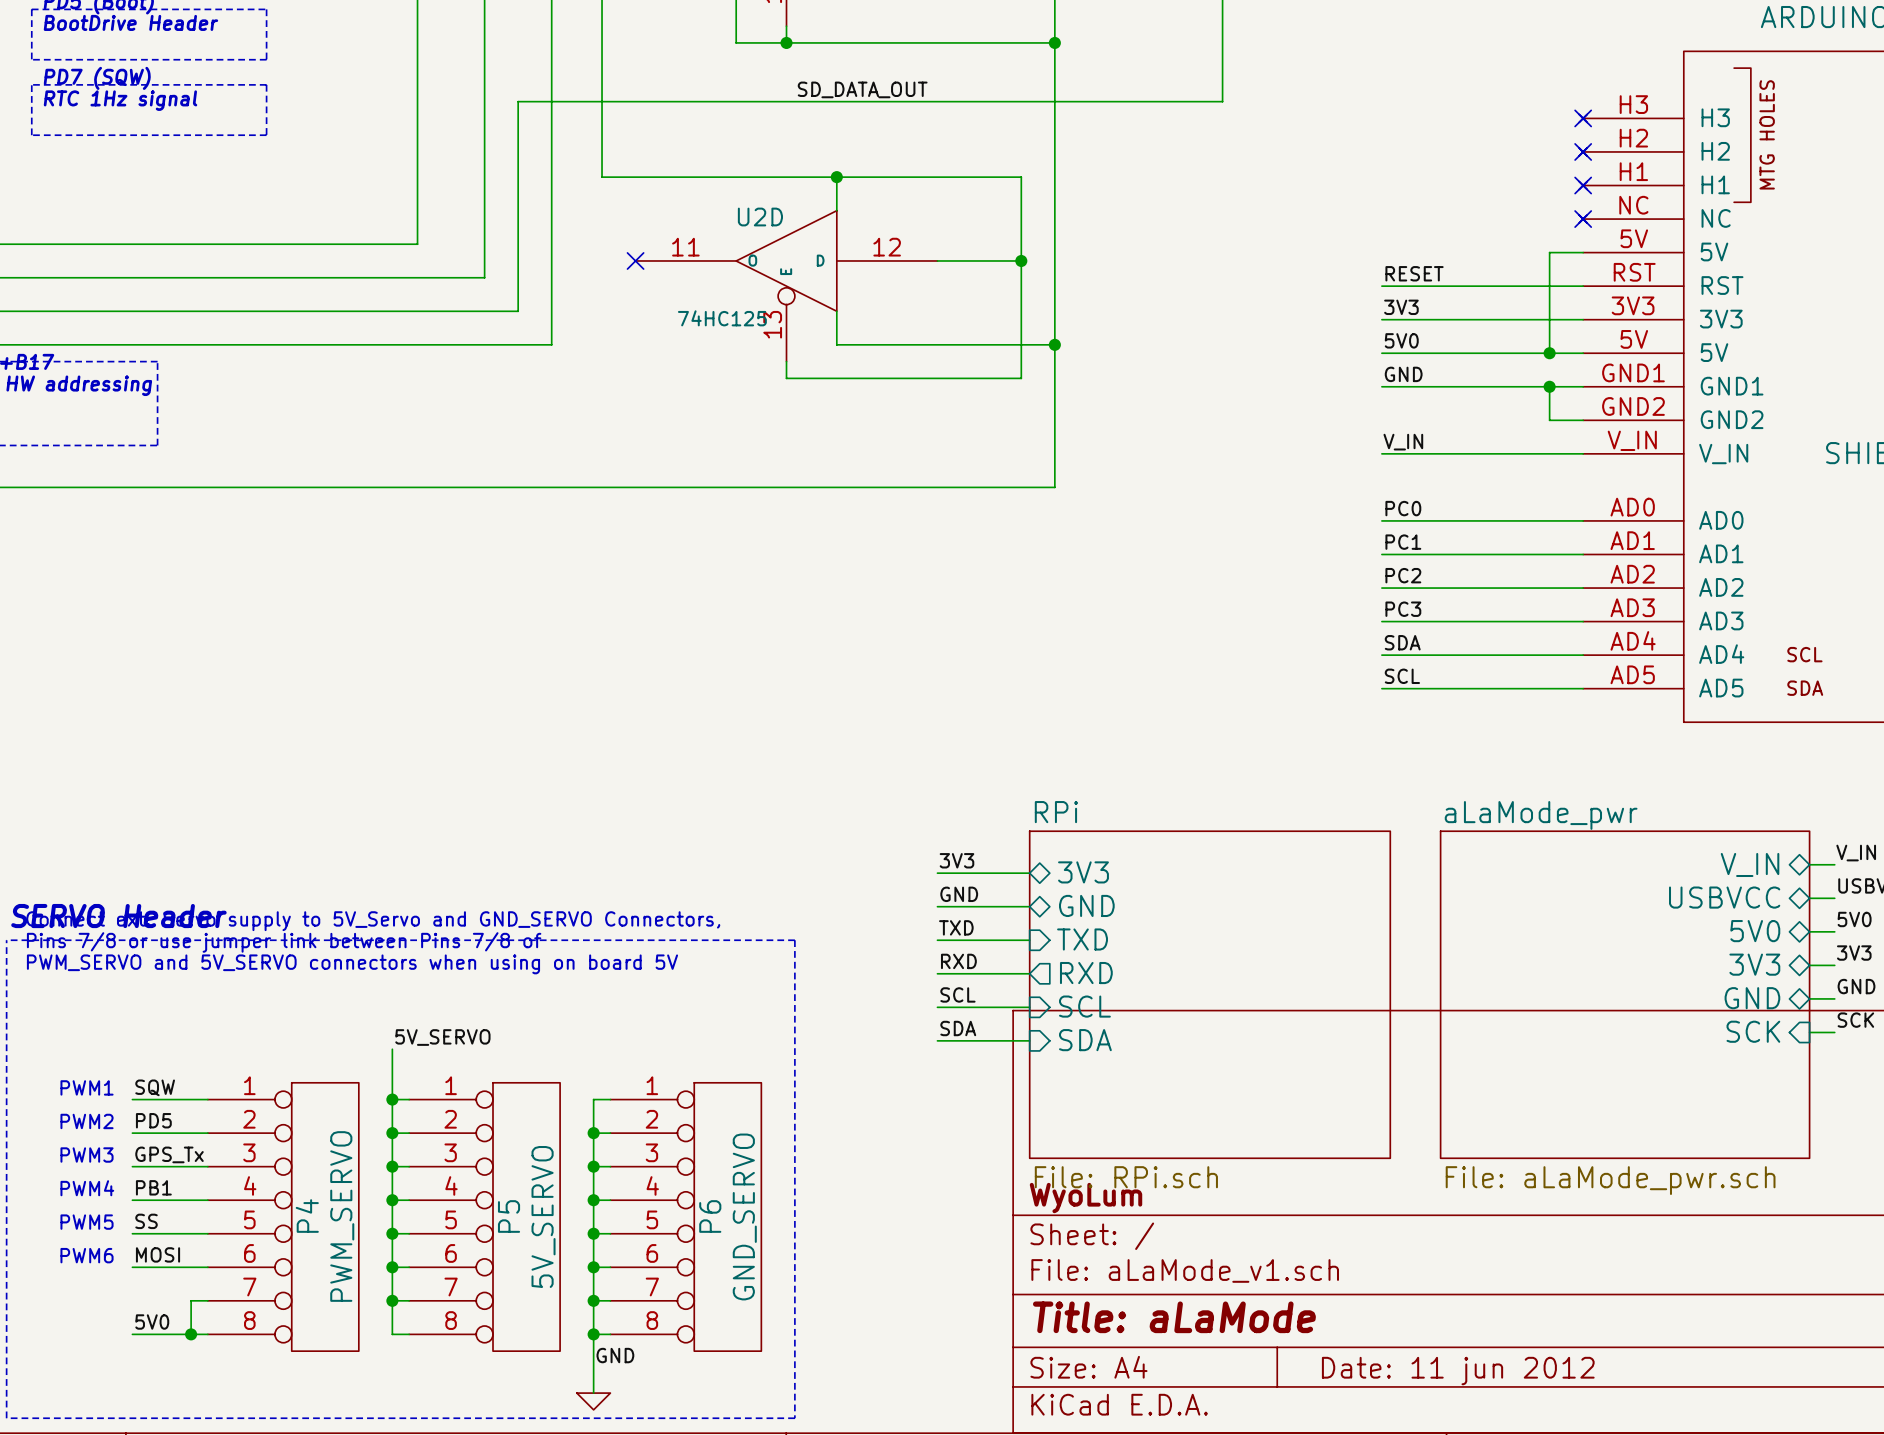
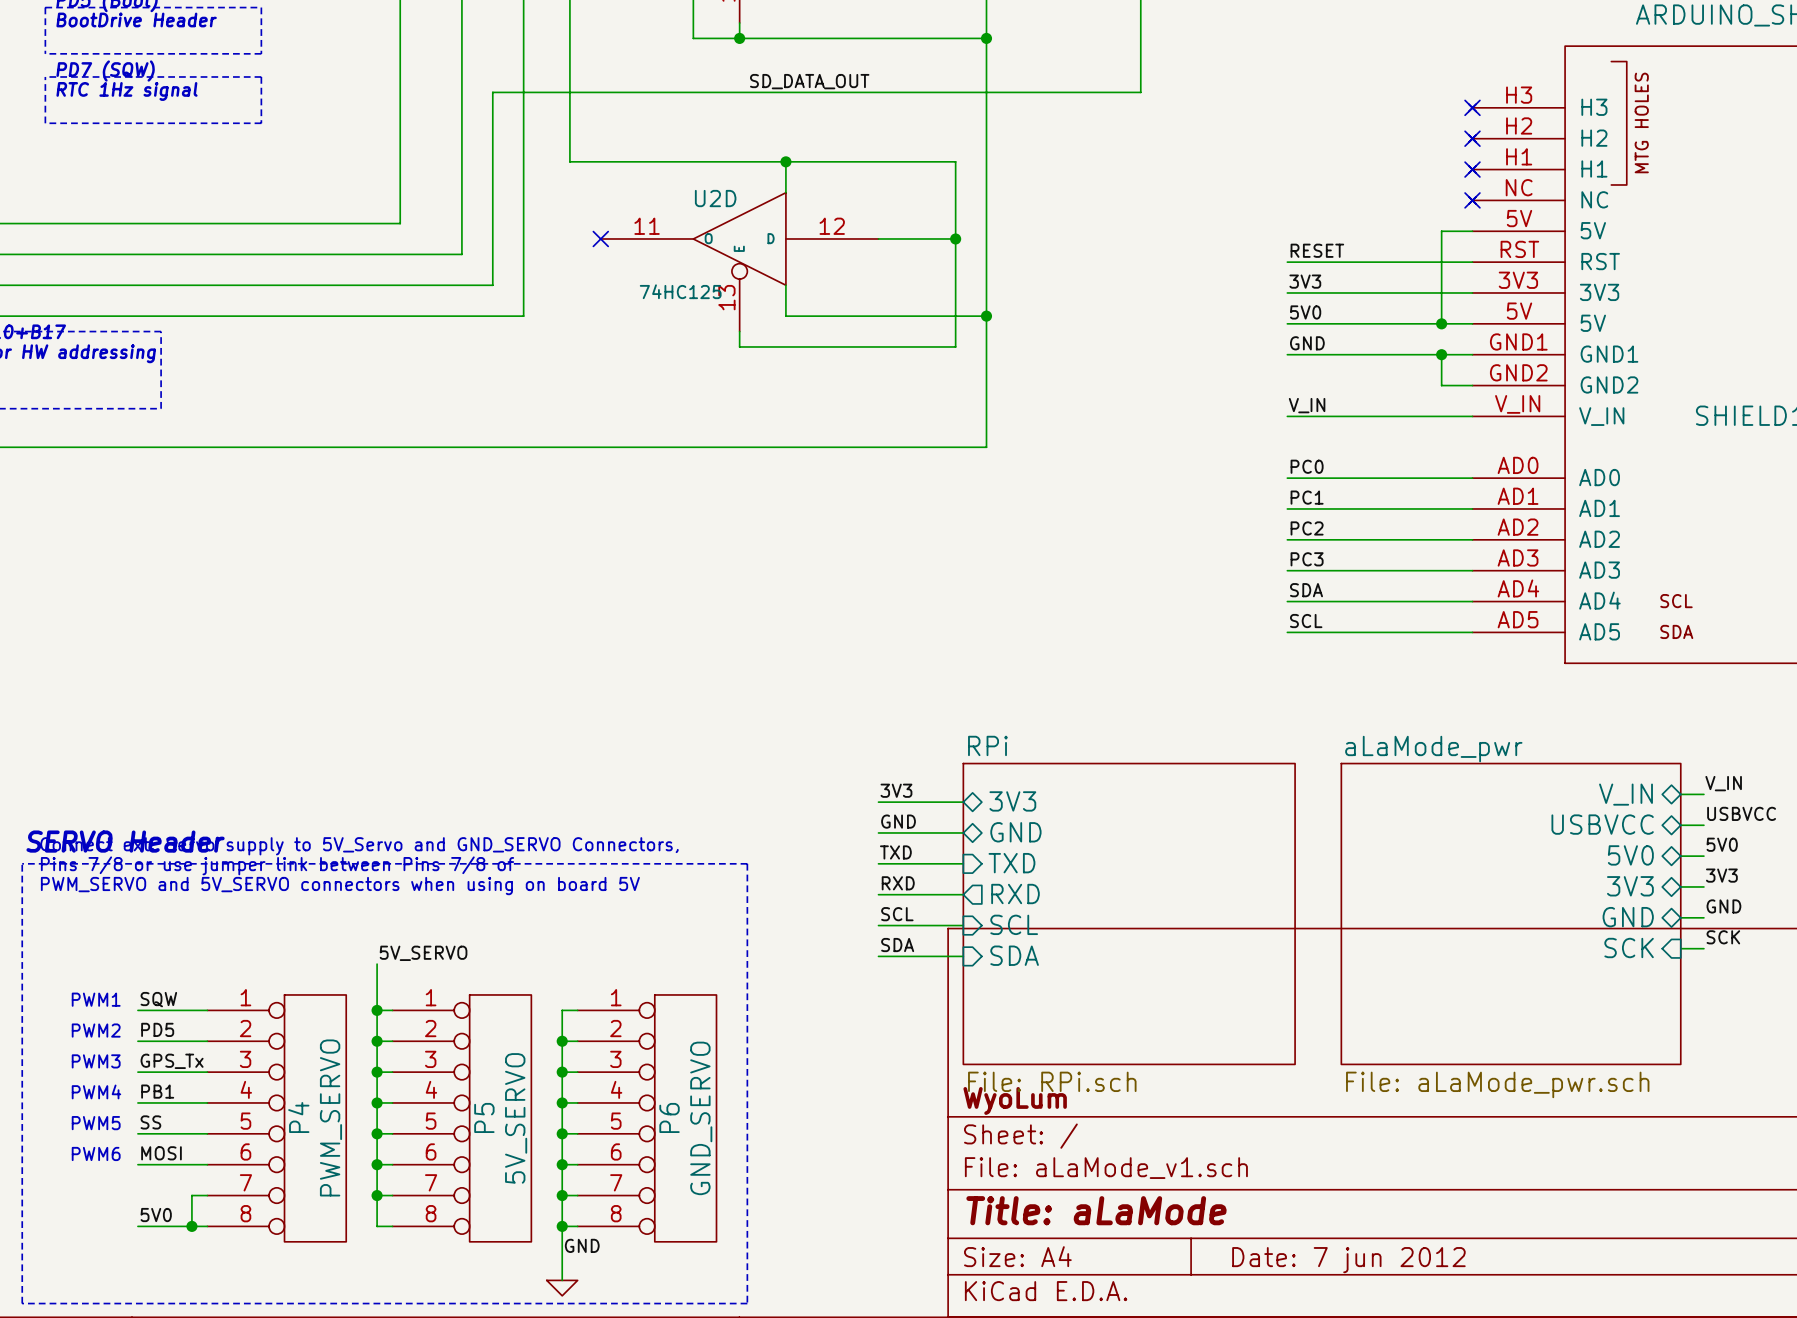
title block: Date: 11 jun 2012 (1458, 1371) -> Date: 7 jun 2012 (1348, 1260)

